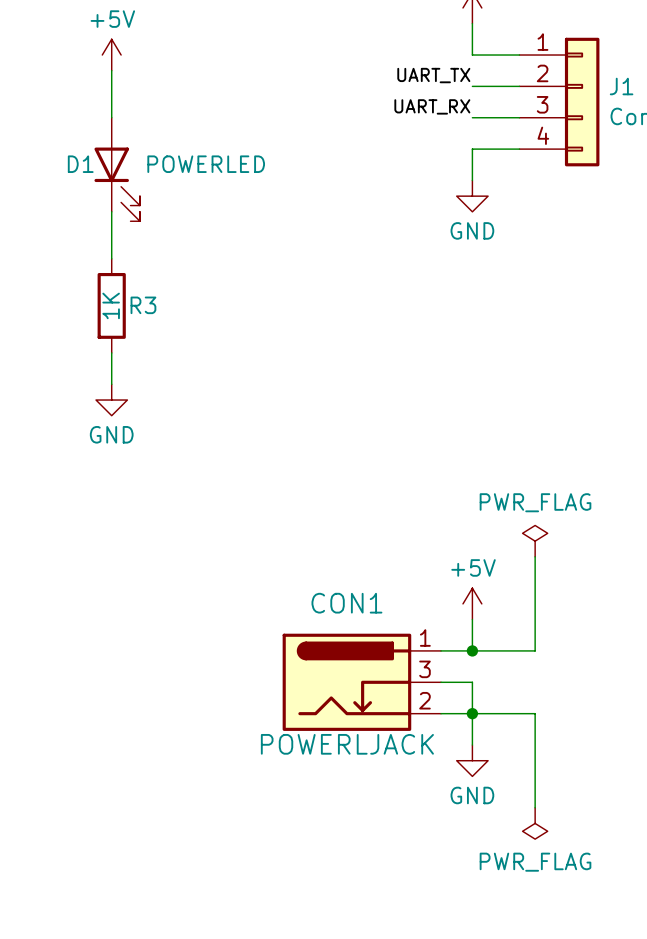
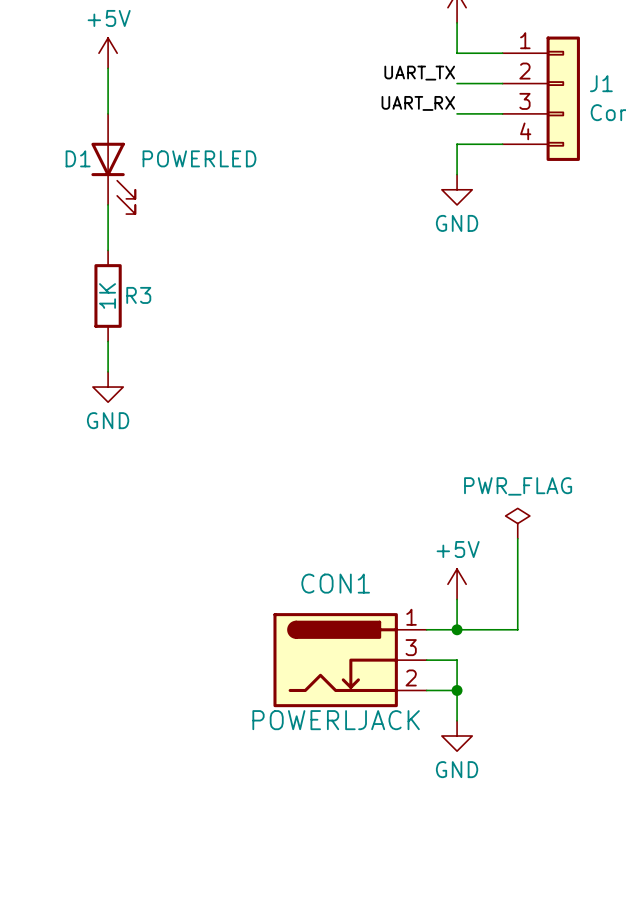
wire: (472, 713) (535, 713) (535, 807) -> none
power symbol: PWR_FLAG (535, 823) -> none

